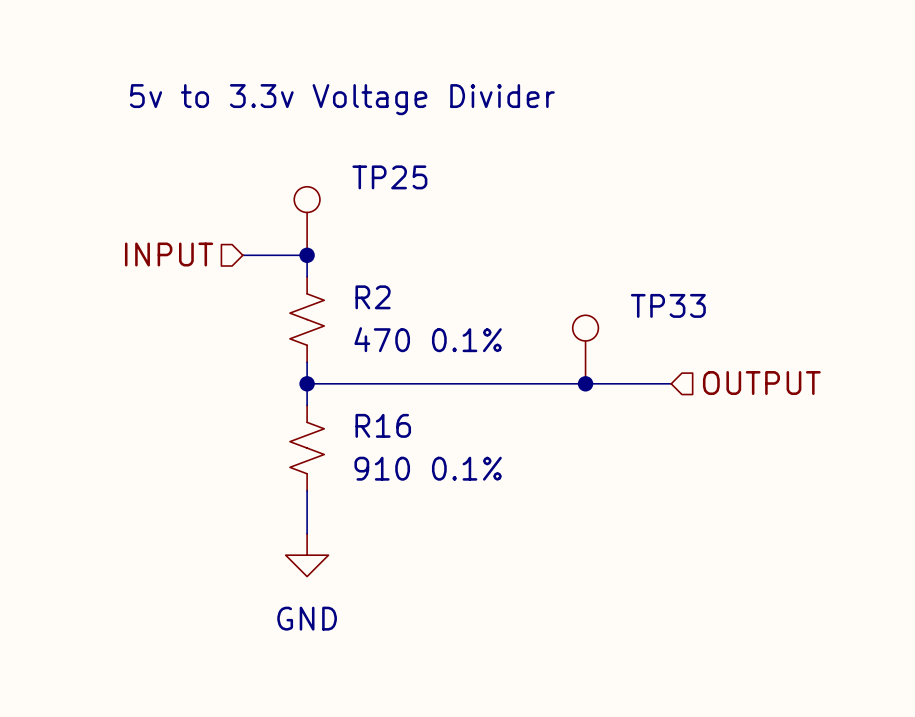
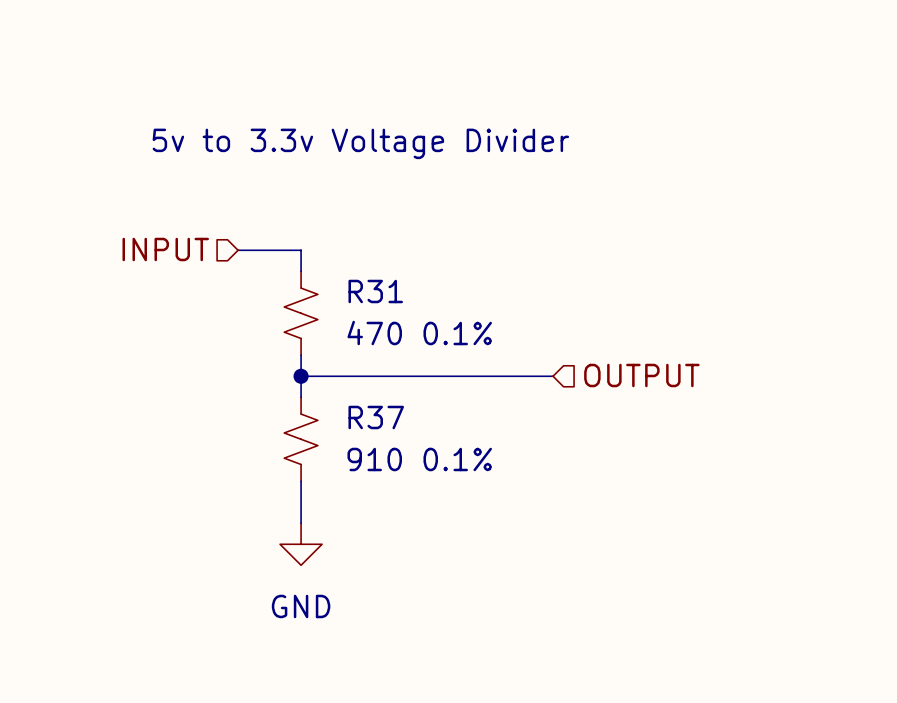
text position: 5v to 3.3v Voltage Divider (342, 99) -> 5v to 3.3v Voltage Divider (360, 143)
TP25: (307, 221) -> none
junction: (307, 255) -> none
R2 name: R2 (373, 297) -> R31 (375, 291)
TP33: (585, 349) -> none
wire: (564, 383) (671, 383) -> none
junction: (585, 383) -> none
hierarchical label position: OUTPUT (761, 383) -> OUTPUT (641, 375)
R16 name: R16 (383, 425) -> R37 (376, 417)

